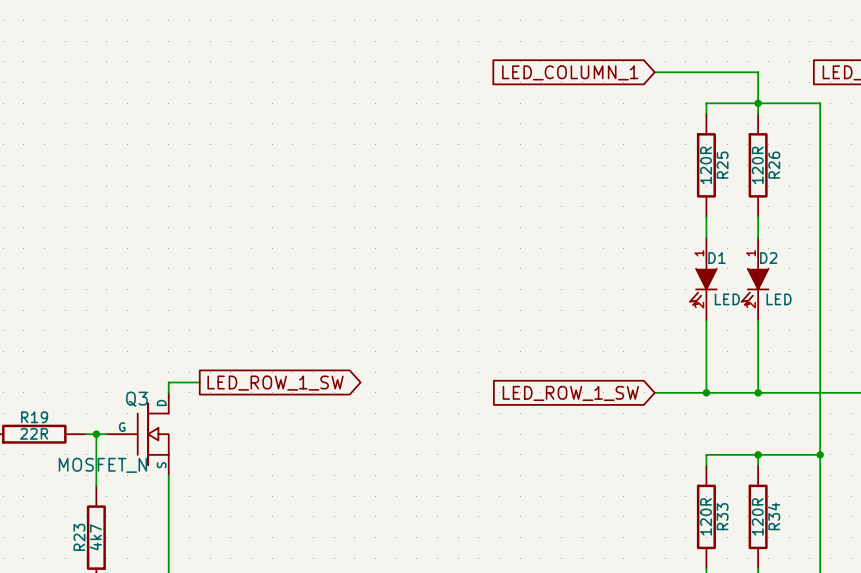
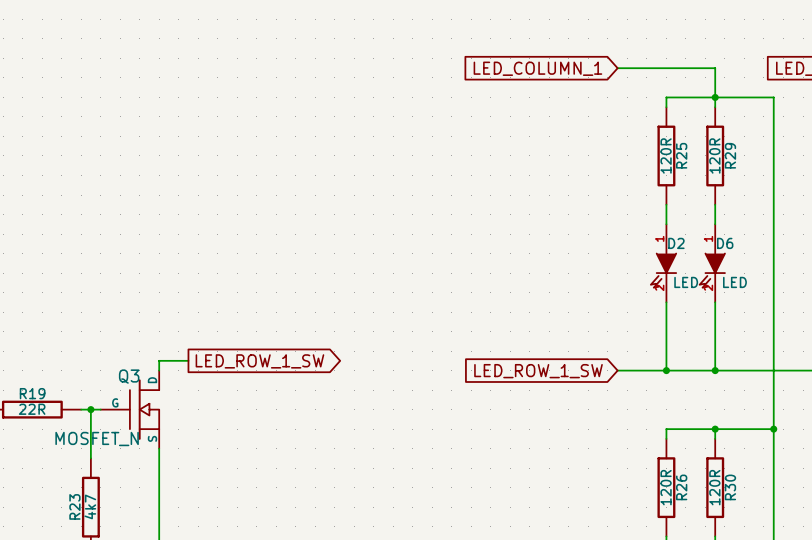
R26 name: R26 (774, 165) -> R29 (730, 155)
D1 name: D1 (717, 258) -> D2 (676, 243)
D2 name: D2 (768, 258) -> D6 (725, 243)
R33 name: R33 (722, 516) -> R26 (681, 487)
R34 name: R34 (774, 516) -> R30 (730, 487)

